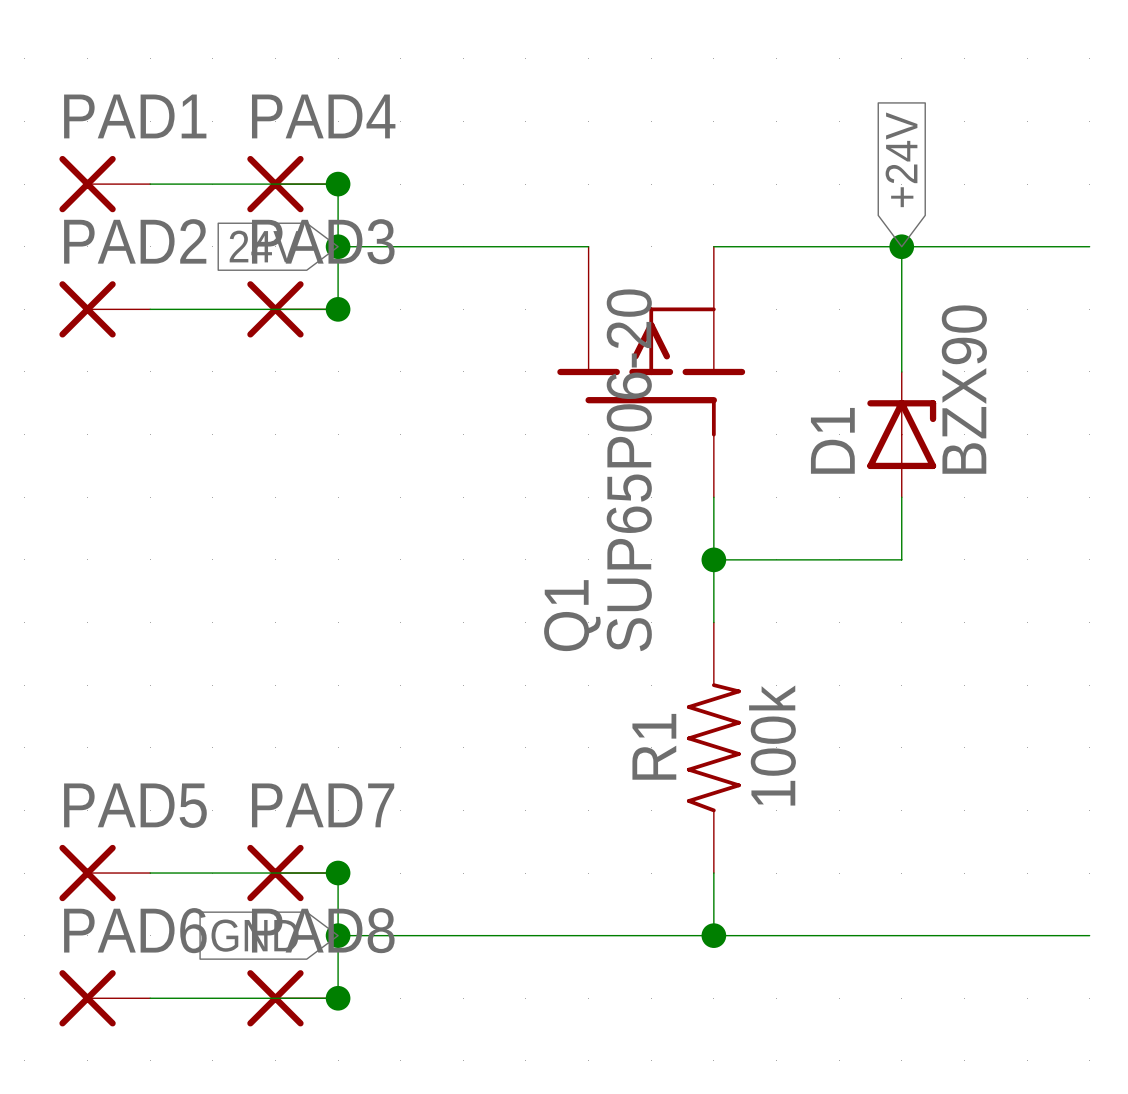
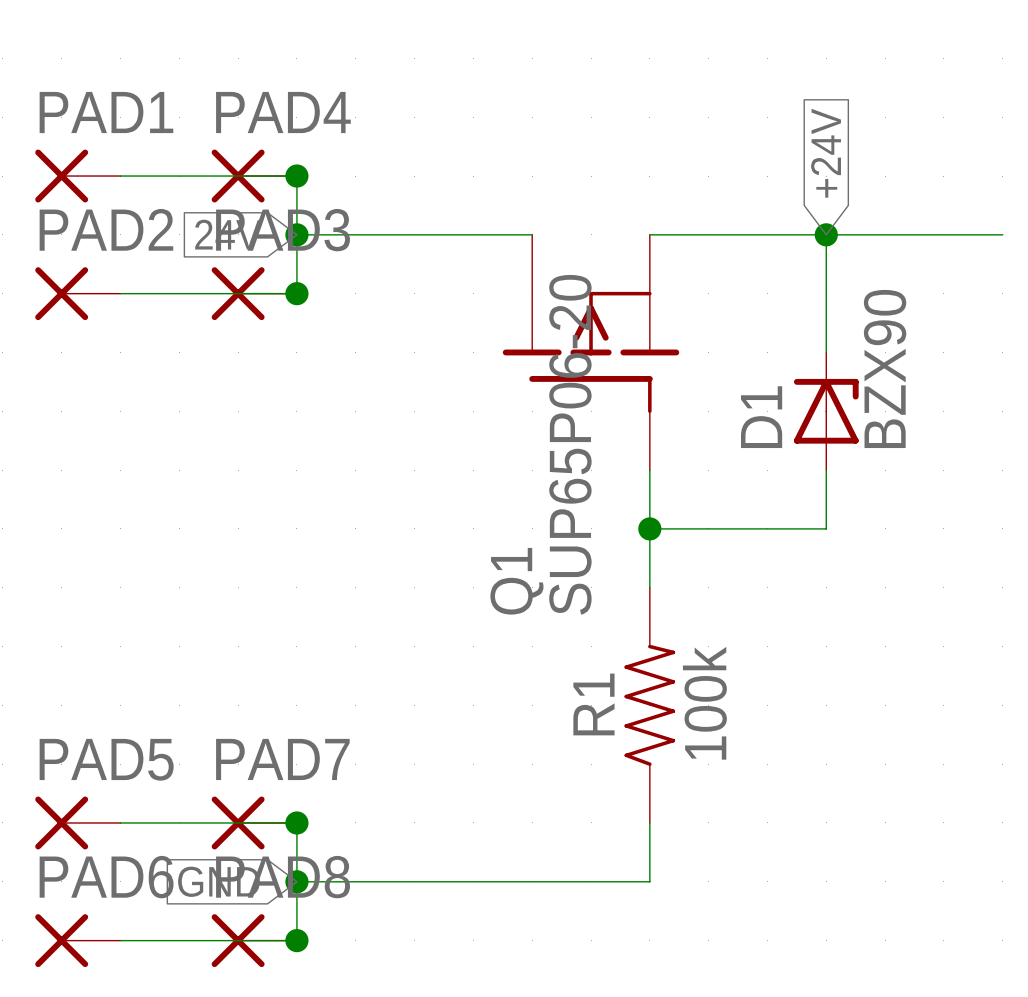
wire: (713, 935) (1089, 935) -> none
junction: (713, 935) -> none

